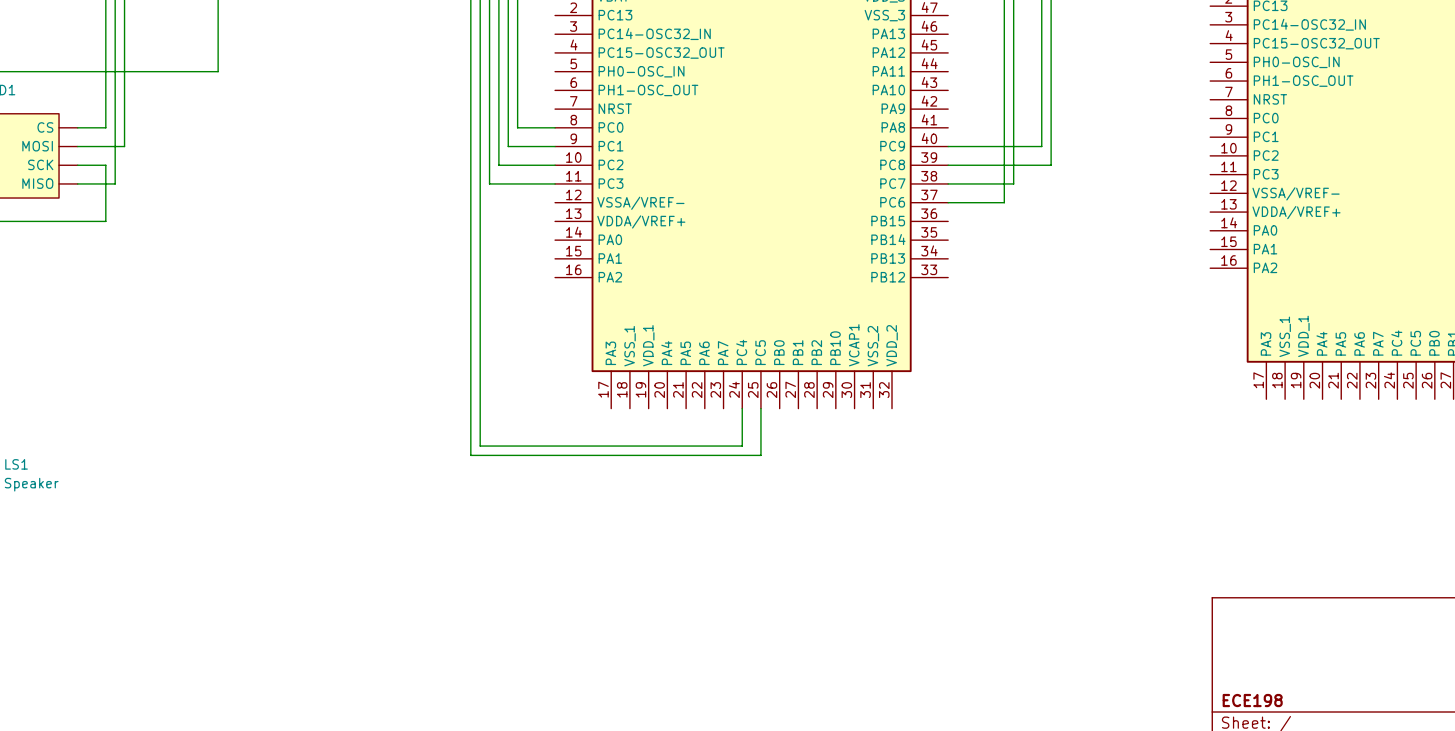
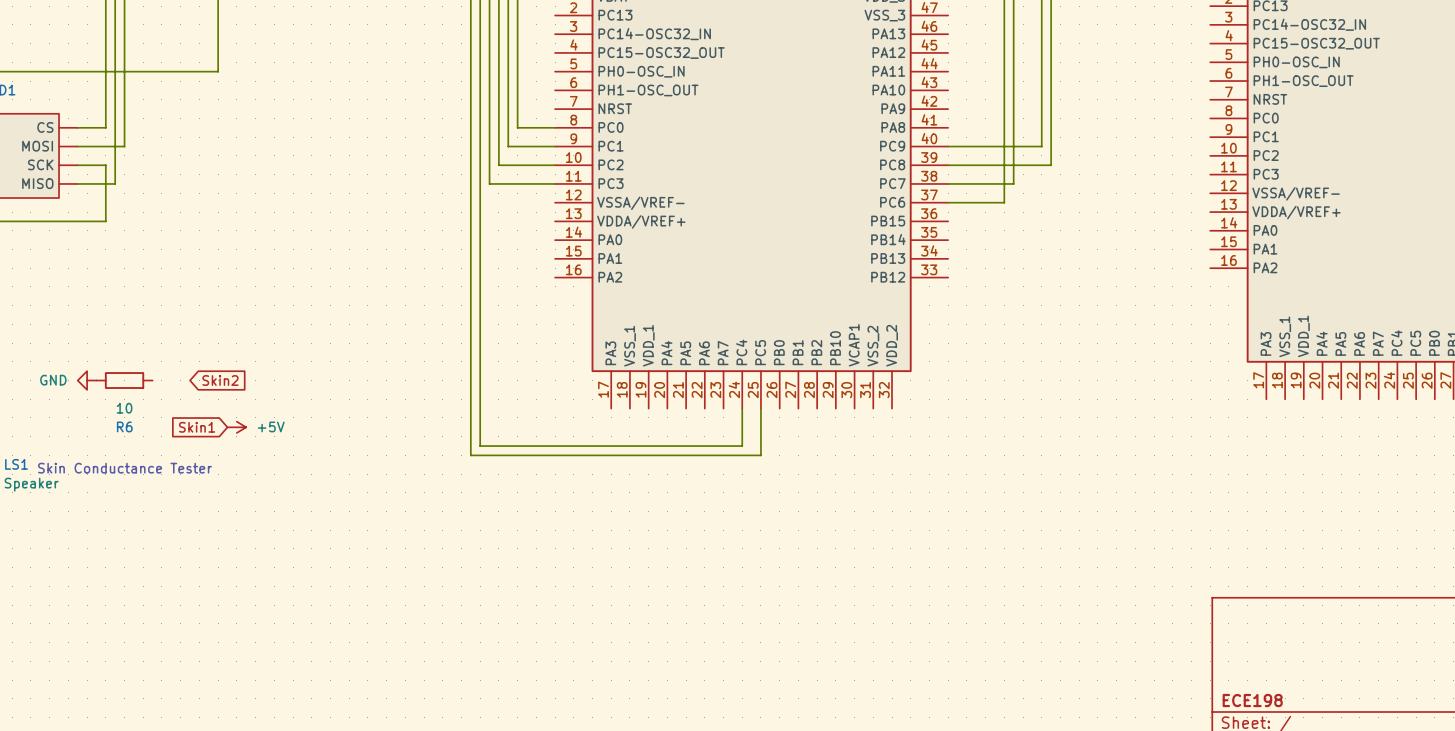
power symbol: none -> GND (87, 380)
R6: none -> 10 (124, 380)
global label: none -> Skin2 (220, 380)
global label: none -> Skin1 (197, 427)
power symbol: none -> +5V (236, 427)
text: none -> Skin Conductance Tester (124, 468)

